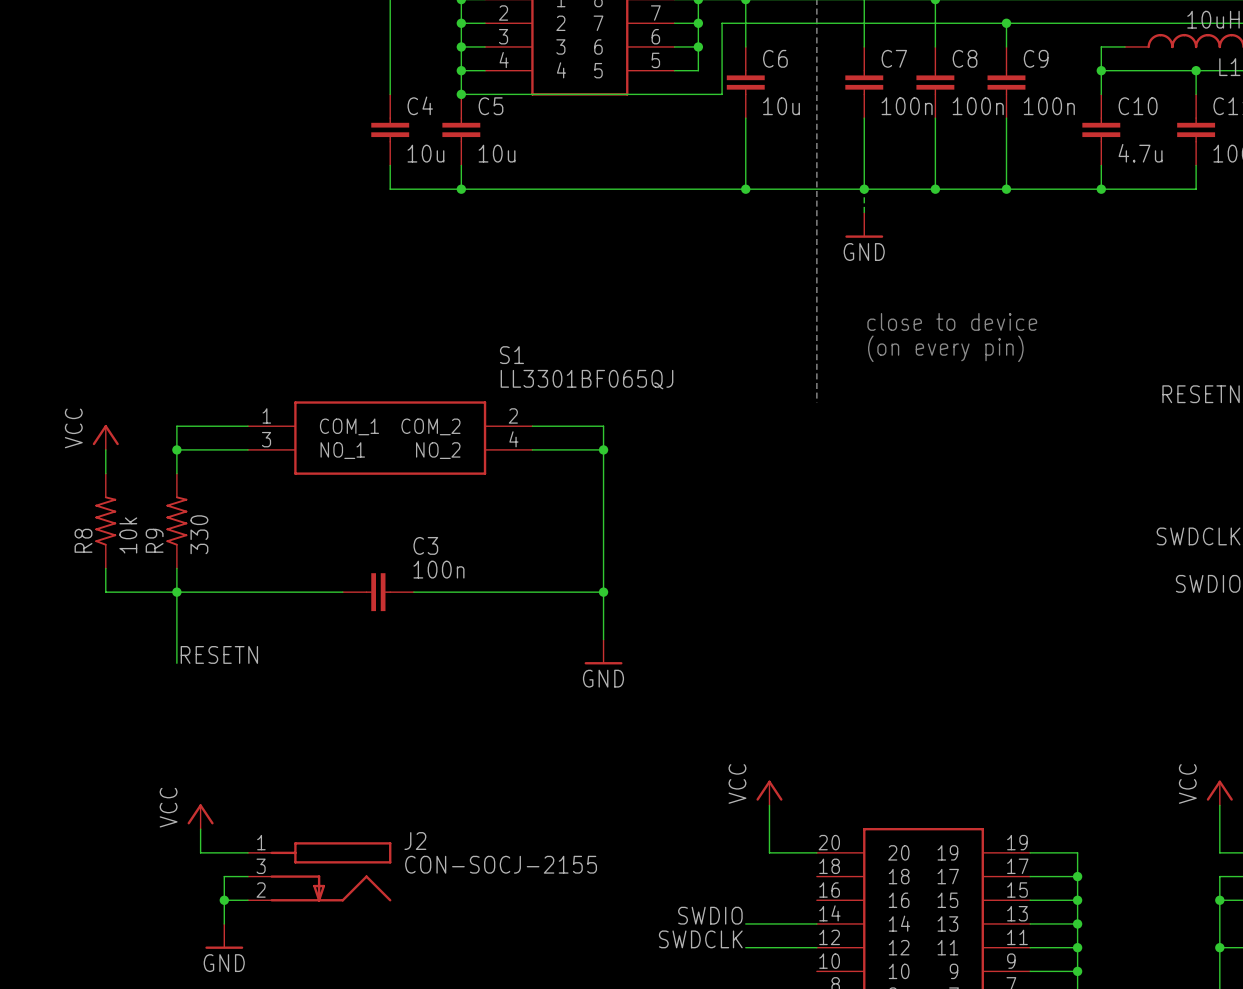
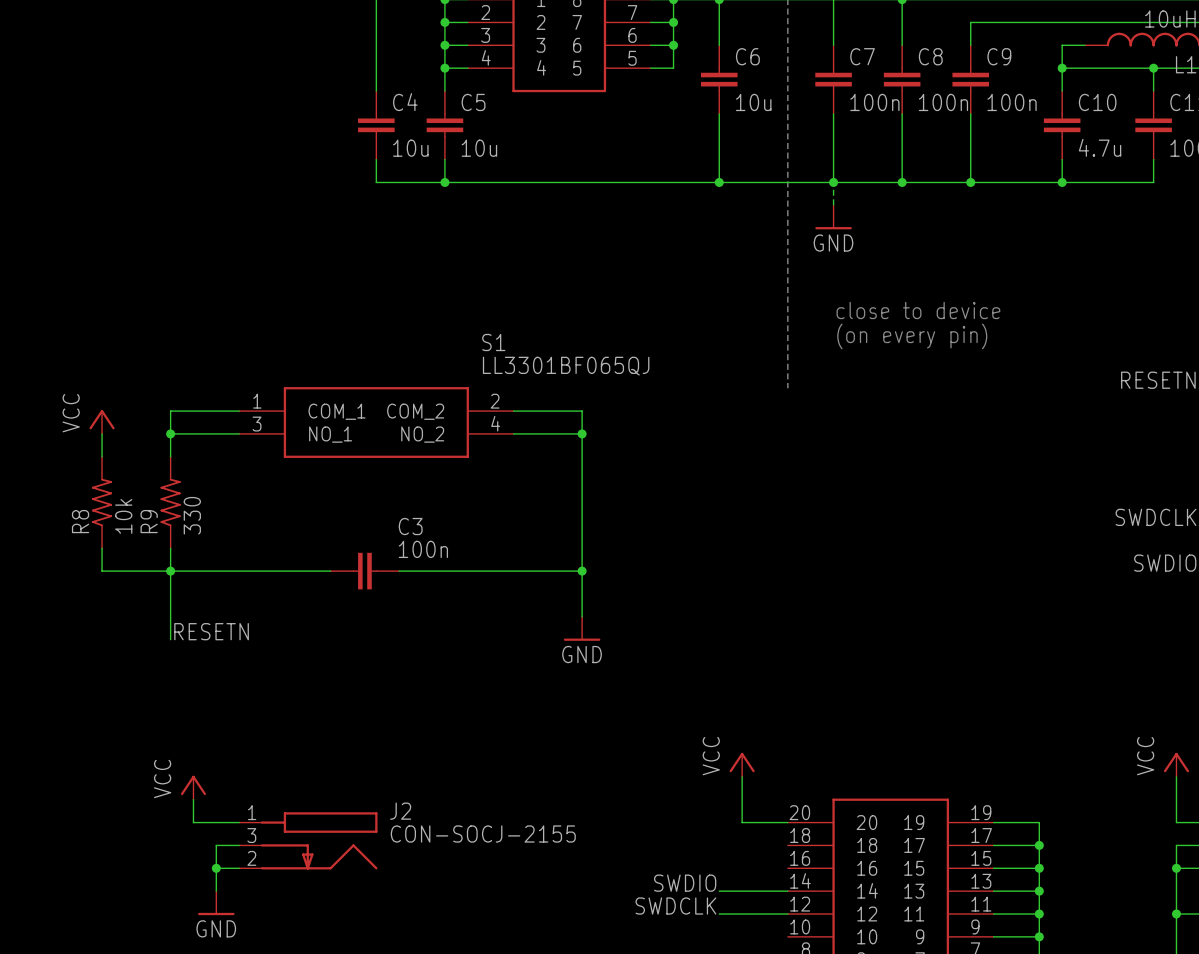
wire: (1006, 23) (722, 23) (722, 94) (461, 94) -> none
junction: (1006, 23) -> none
junction: (461, 94) -> none

